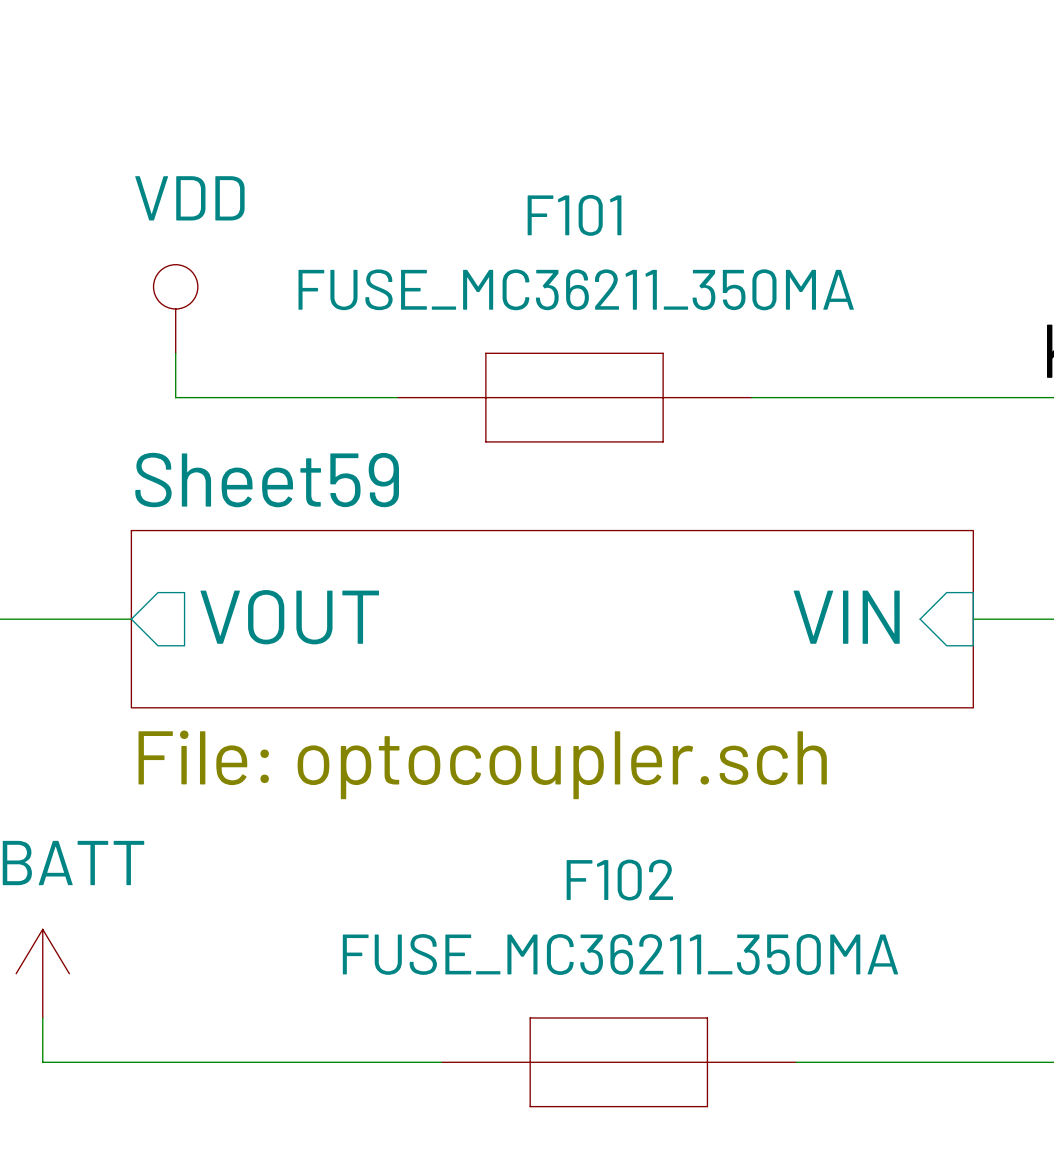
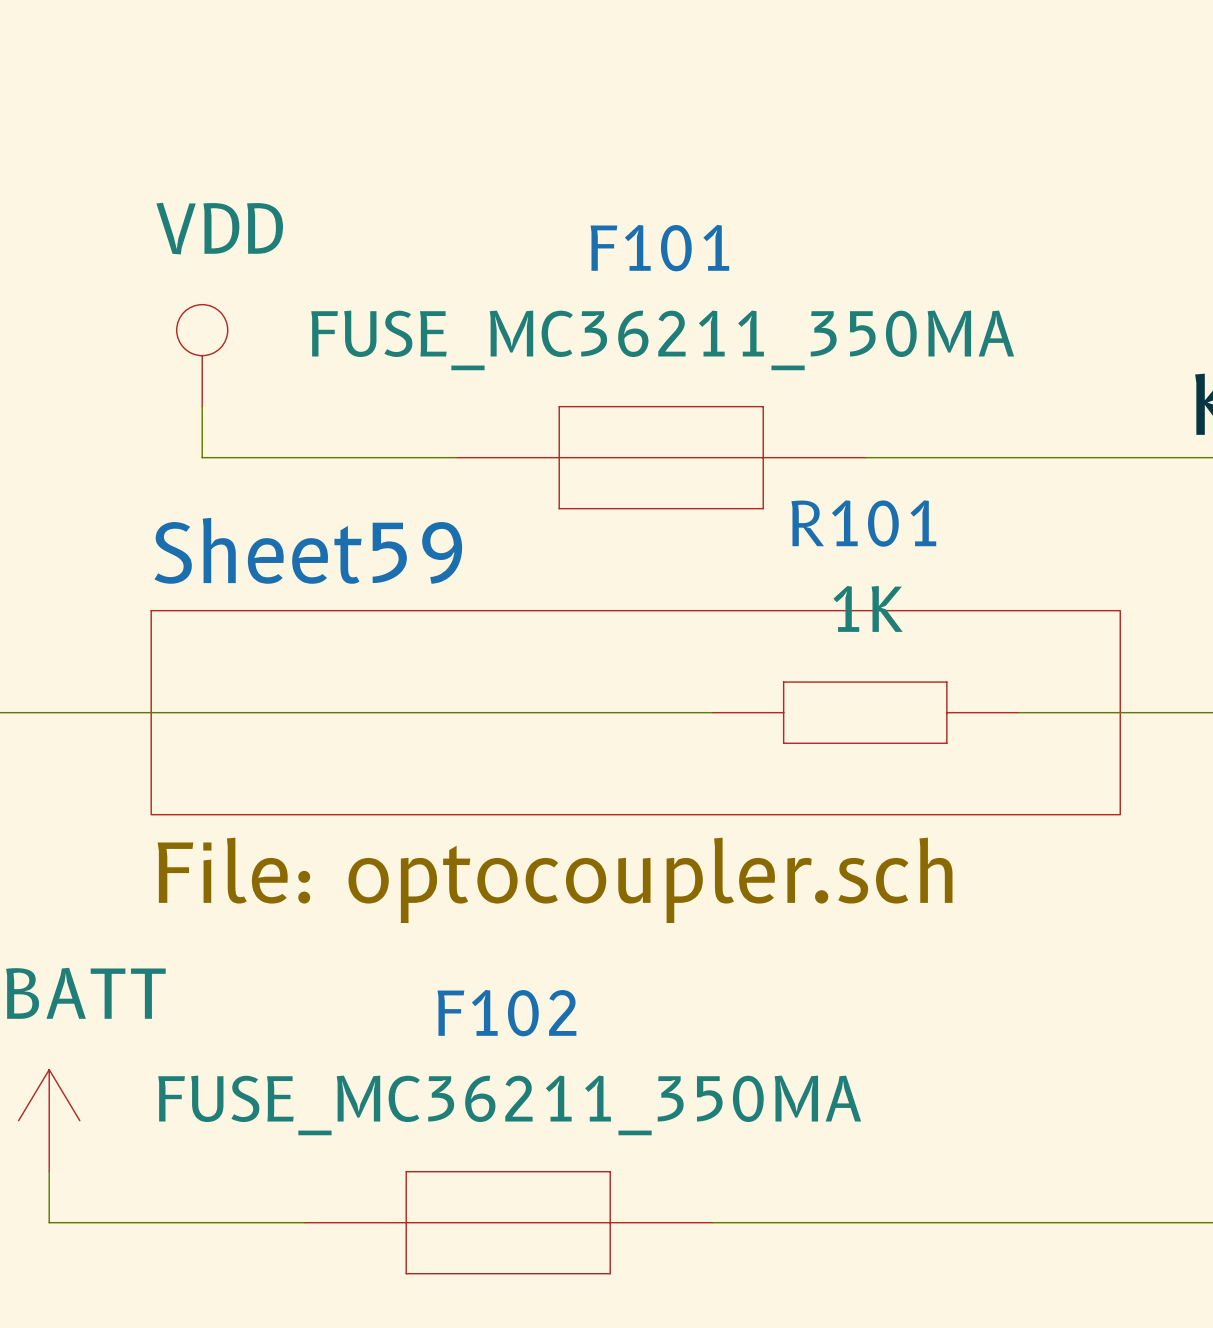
sheet pin: VOUT (289, 617) -> none
sheet pin: VIN (846, 617) -> none
wire: none -> (151, 712) (712, 712)
R101: none -> 1K (865, 712)
wire: none -> (1018, 712) (1120, 712)
F102 position: (618, 1062) -> (508, 1222)

